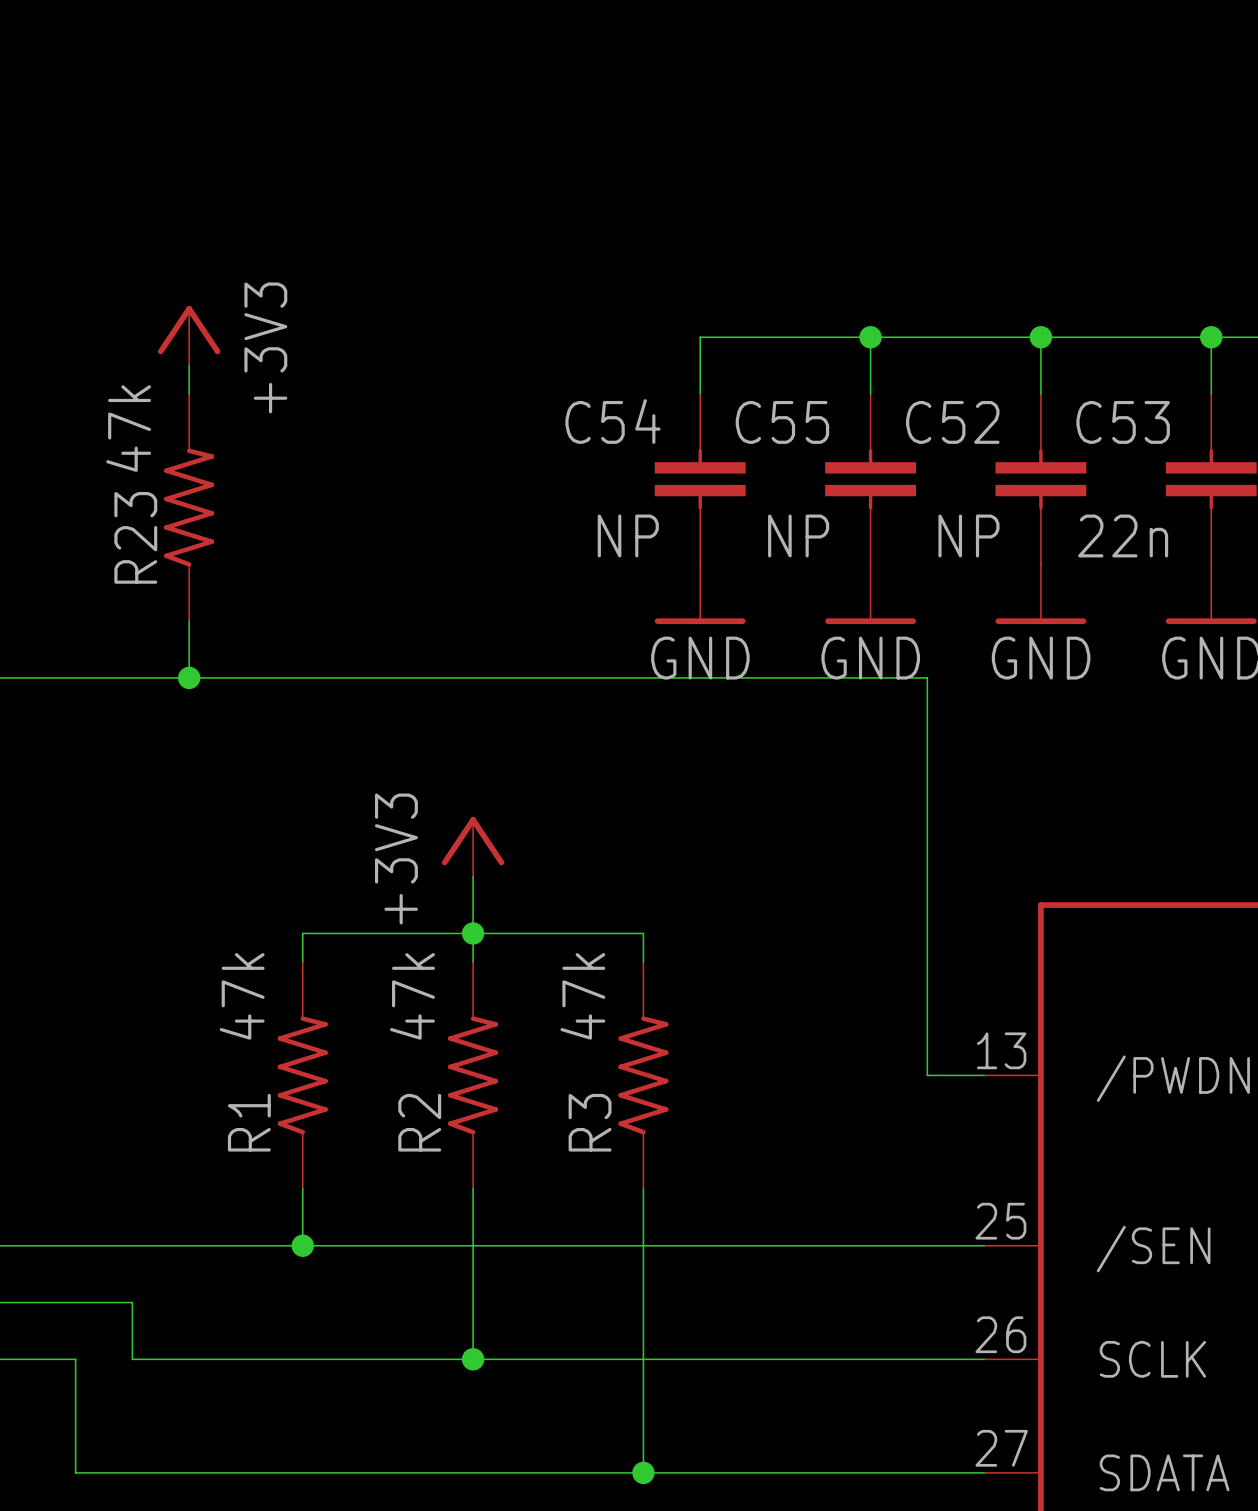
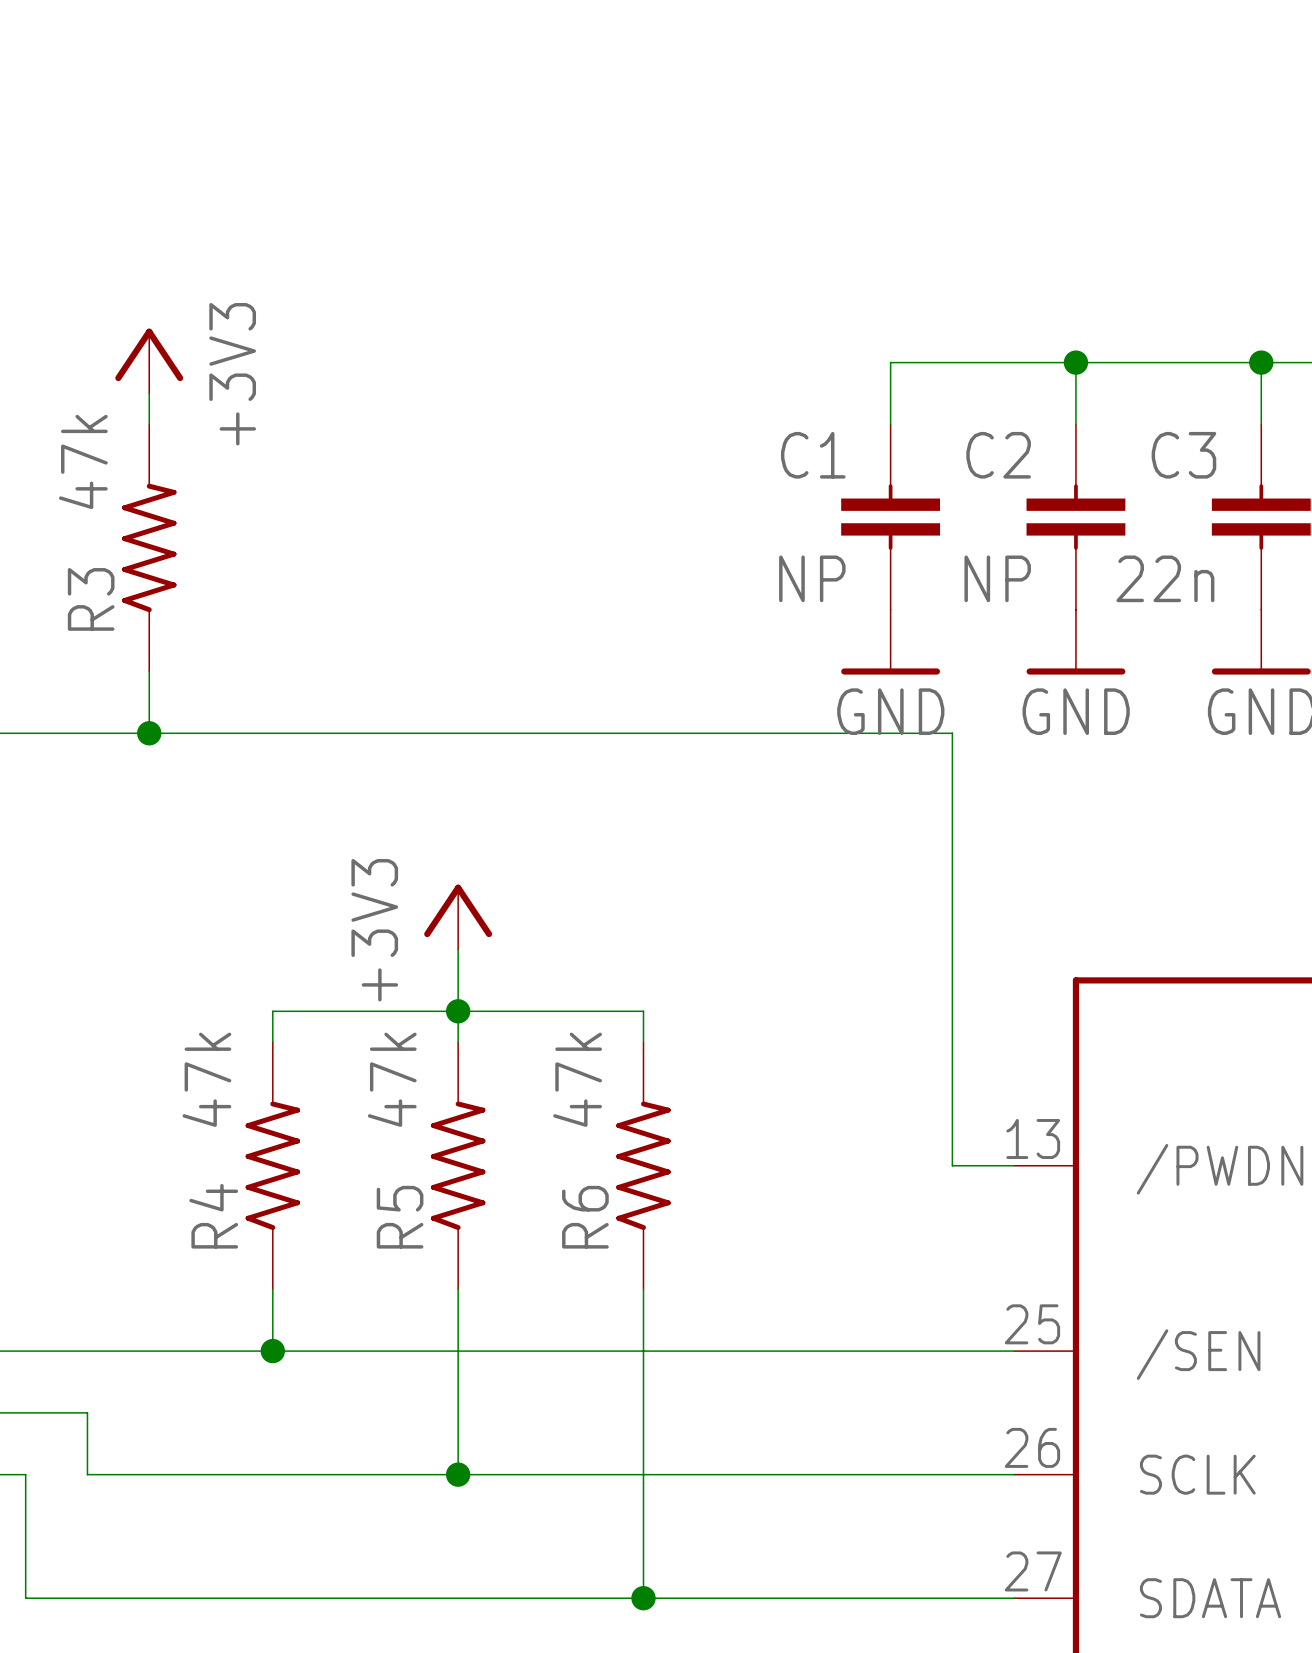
wire: (870, 337) (700, 337) (700, 394) -> none
junction: (870, 337) -> none
C55 name: C55 (782, 422) -> C1 (813, 455)
C52 name: C52 (952, 422) -> C2 (998, 455)
C53 name: C53 (1123, 422) -> C3 (1183, 455)
C54: NP (700, 479) -> none
R23 name: R23 (135, 537) -> R3 (91, 599)
power symbol: GND (700, 594) -> none
R1 name: R1 (249, 1122) -> R4 (213, 1216)
R2 name: R2 (419, 1122) -> R5 (400, 1217)
R3 name: R3 (590, 1122) -> R6 (585, 1217)

